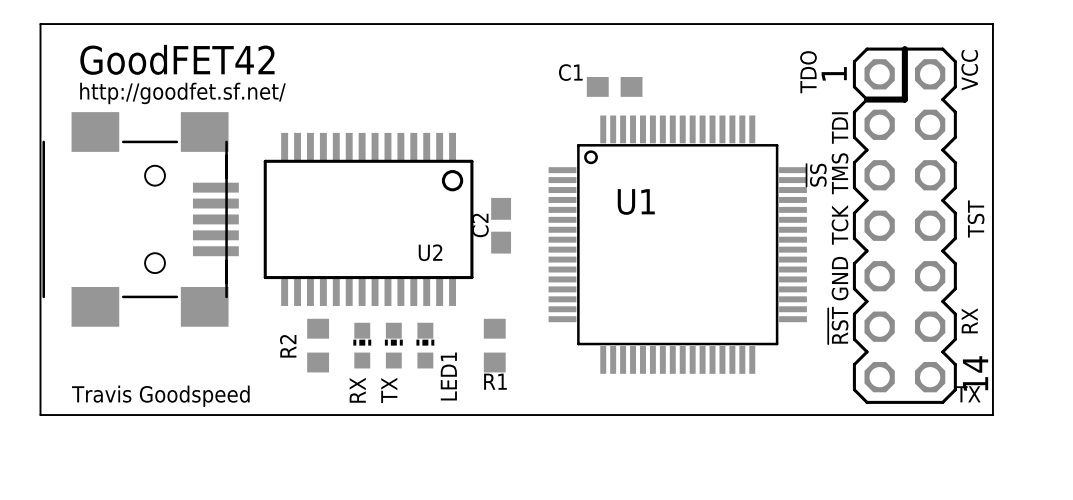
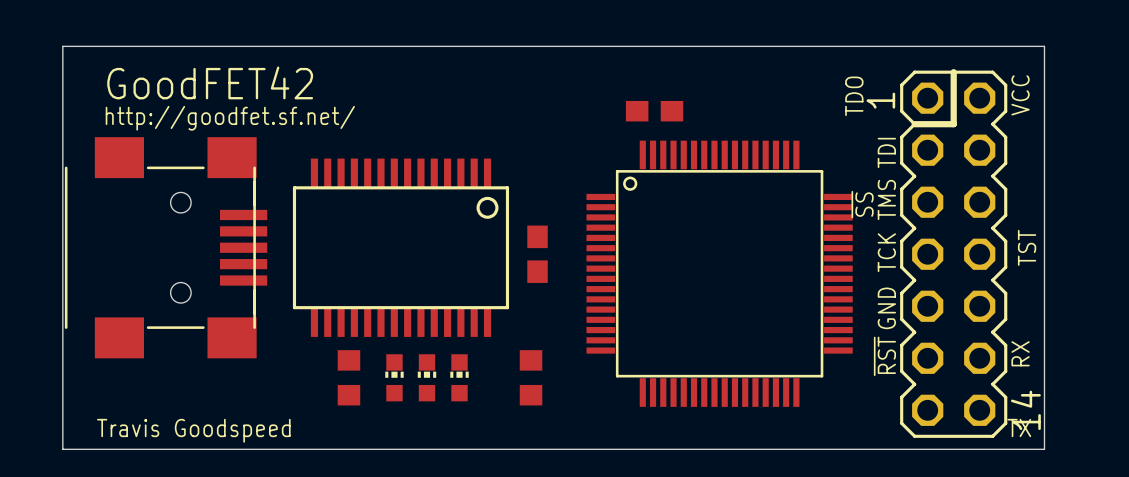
C1 name: C1 (570, 72) -> none
U1 name: U1 (636, 201) -> none
C2 name: C2 (480, 225) -> none
U2 name: U2 (430, 252) -> none
R2 name: R2 (288, 346) -> none
LED1 name: LED1 (448, 376) -> none
R1 name: R1 (495, 381) -> none
RX name: RX (357, 390) -> none
TX name: TX (389, 390) -> none

